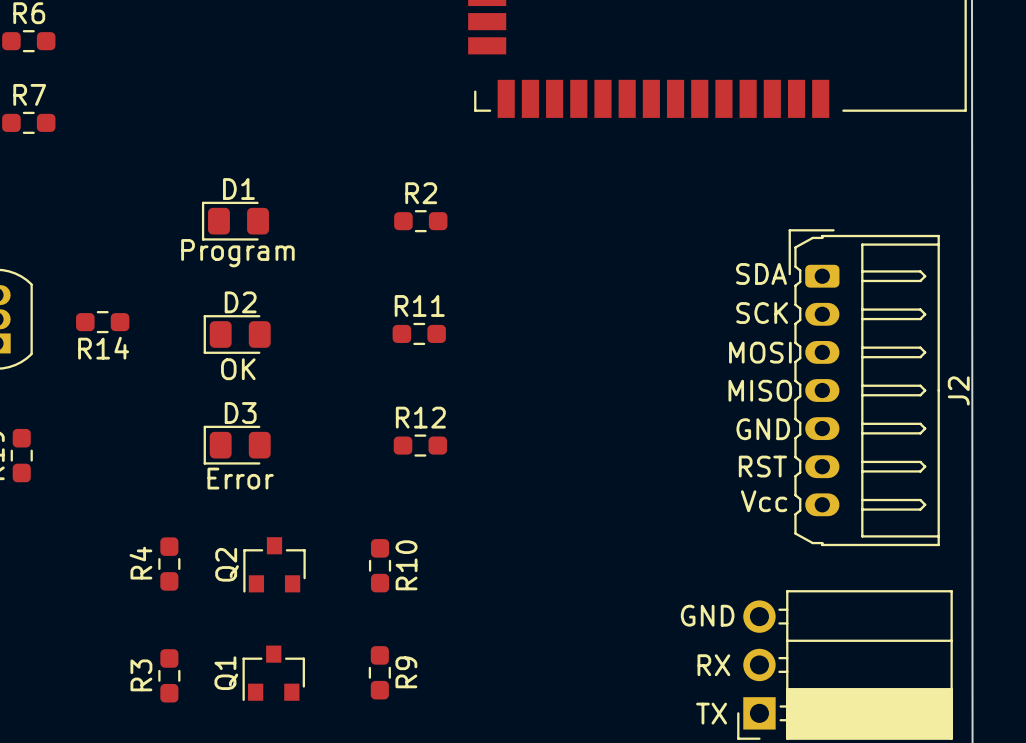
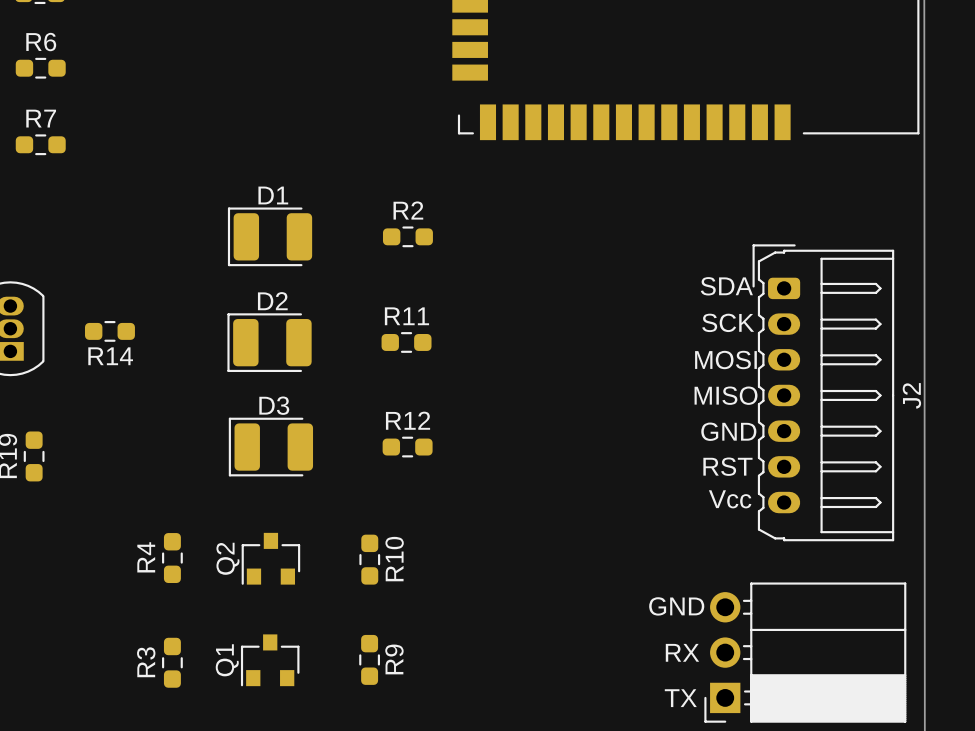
D1 footprint: [201, 201, 269, 241] -> [227, 207, 313, 267]
text: Program (237, 253) -> none
D2 footprint: [203, 315, 271, 354] -> [227, 313, 312, 373]
text: OK (238, 369) -> none
D3 footprint: [203, 425, 271, 465] -> [228, 417, 314, 477]
text: Error (240, 478) -> none

